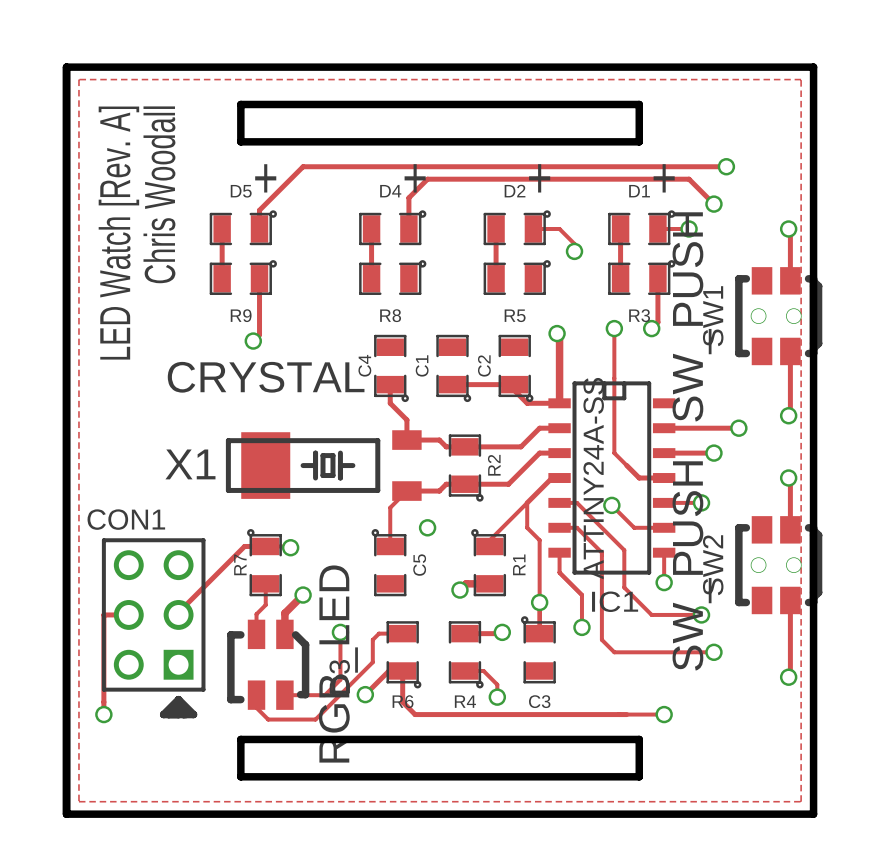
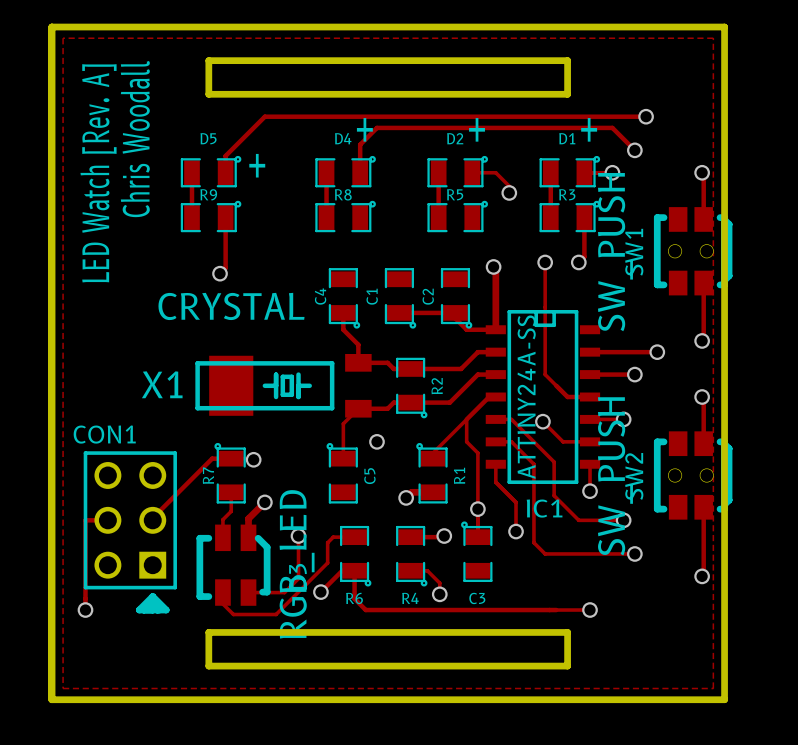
text position: + (265, 178) -> + (257, 165)
R9 name position: R9 (241, 315) -> R9 (208, 194)
R8 name position: R8 (390, 315) -> R8 (343, 194)
R5 name position: R5 (515, 315) -> R5 (455, 194)
R3 name position: R3 (639, 315) -> R3 (567, 194)

